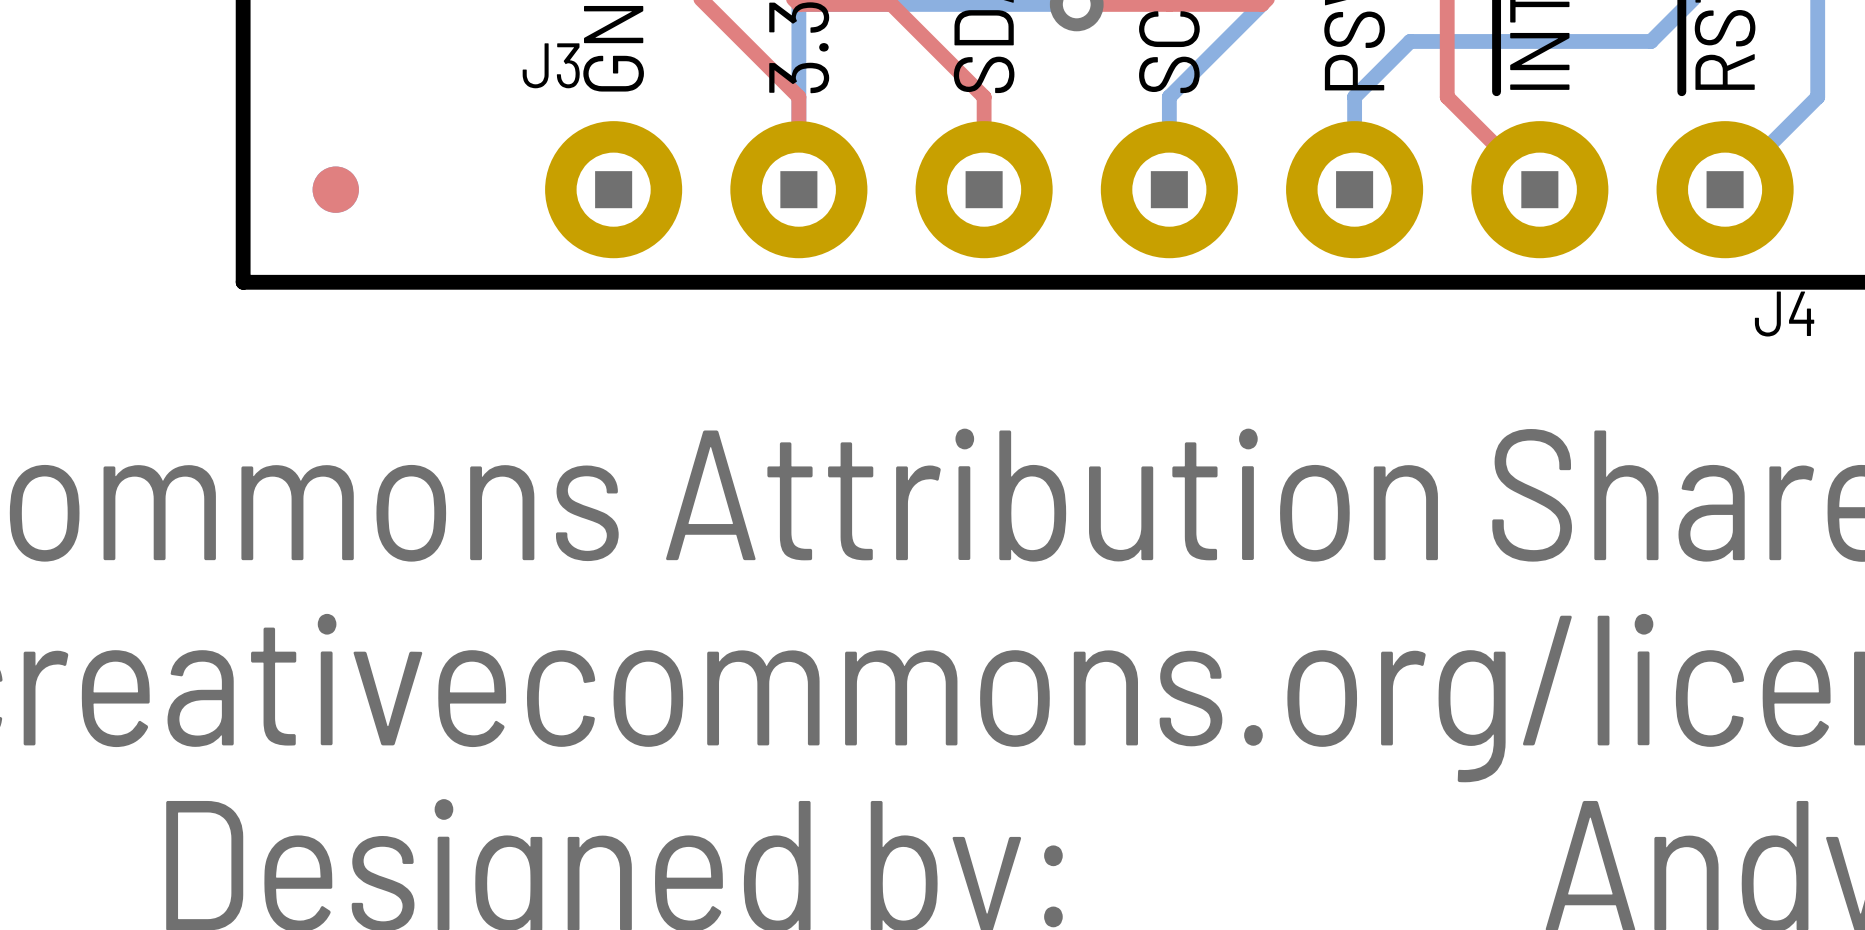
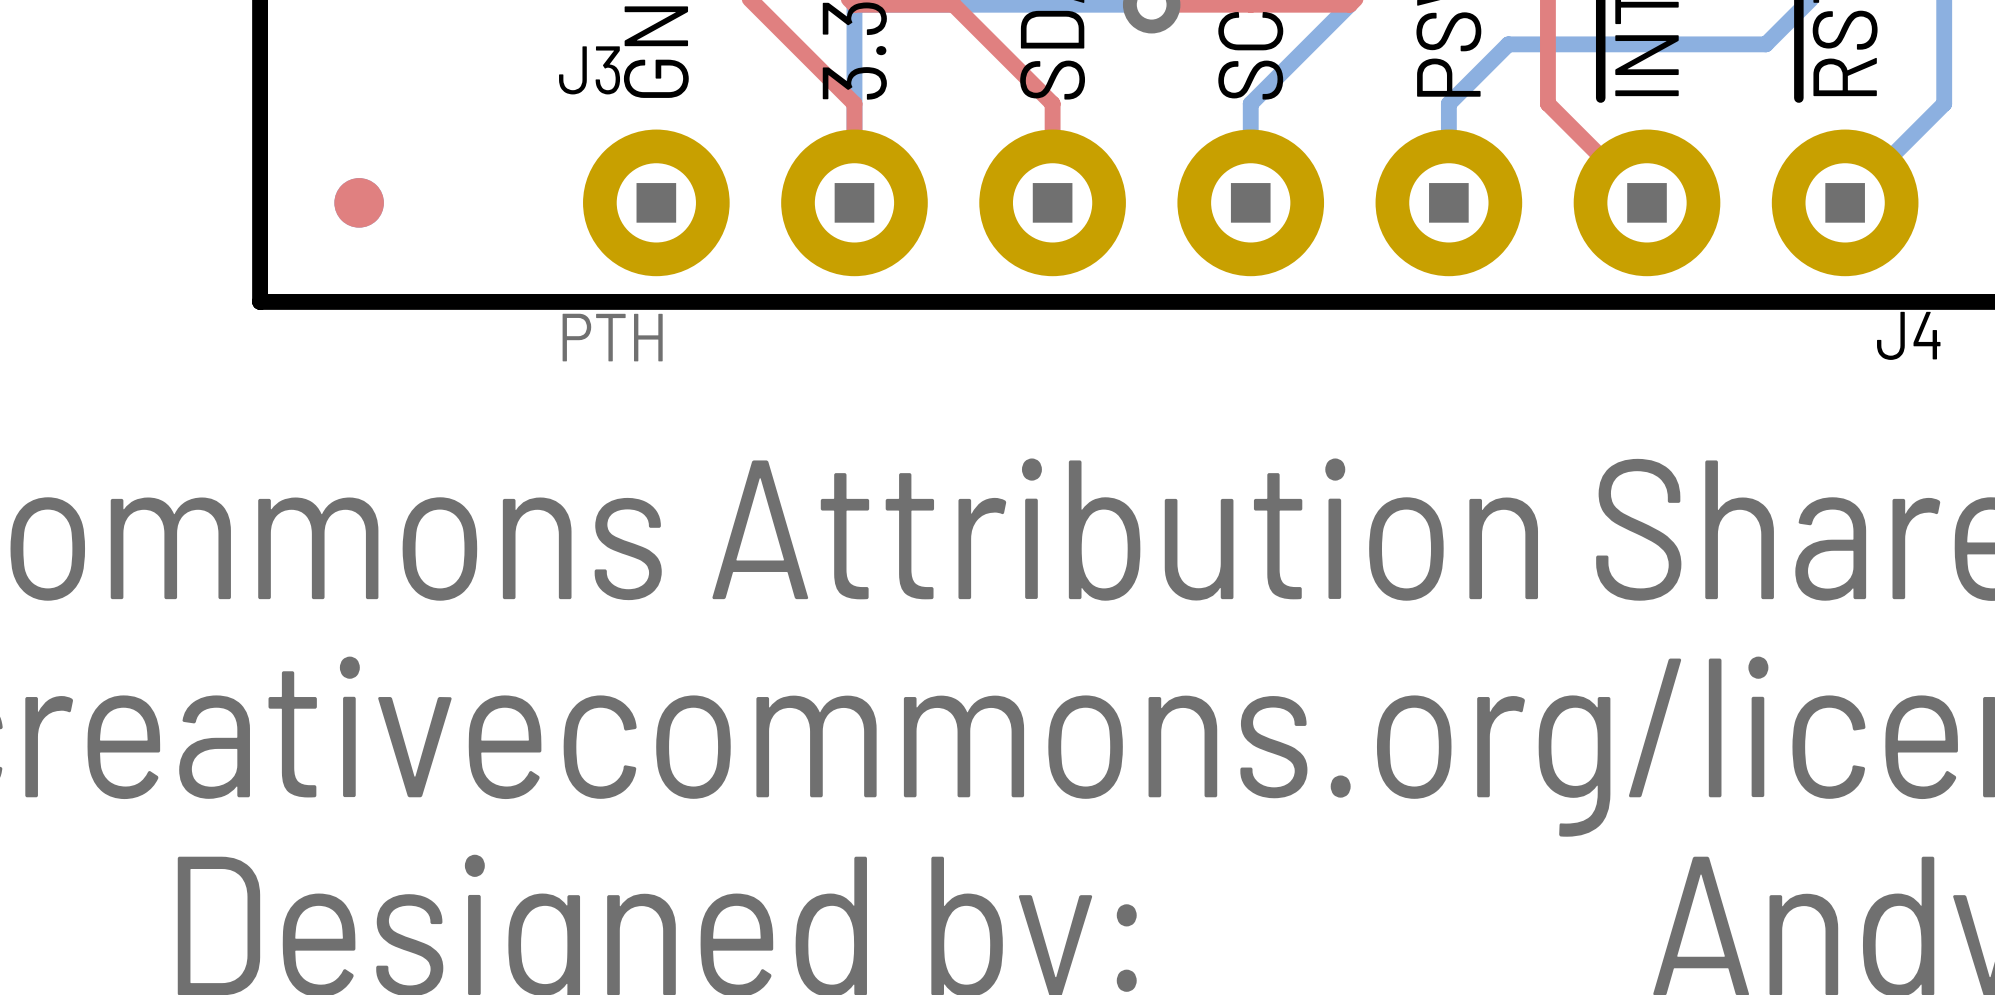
J3 value: none -> PTH (612, 337)

